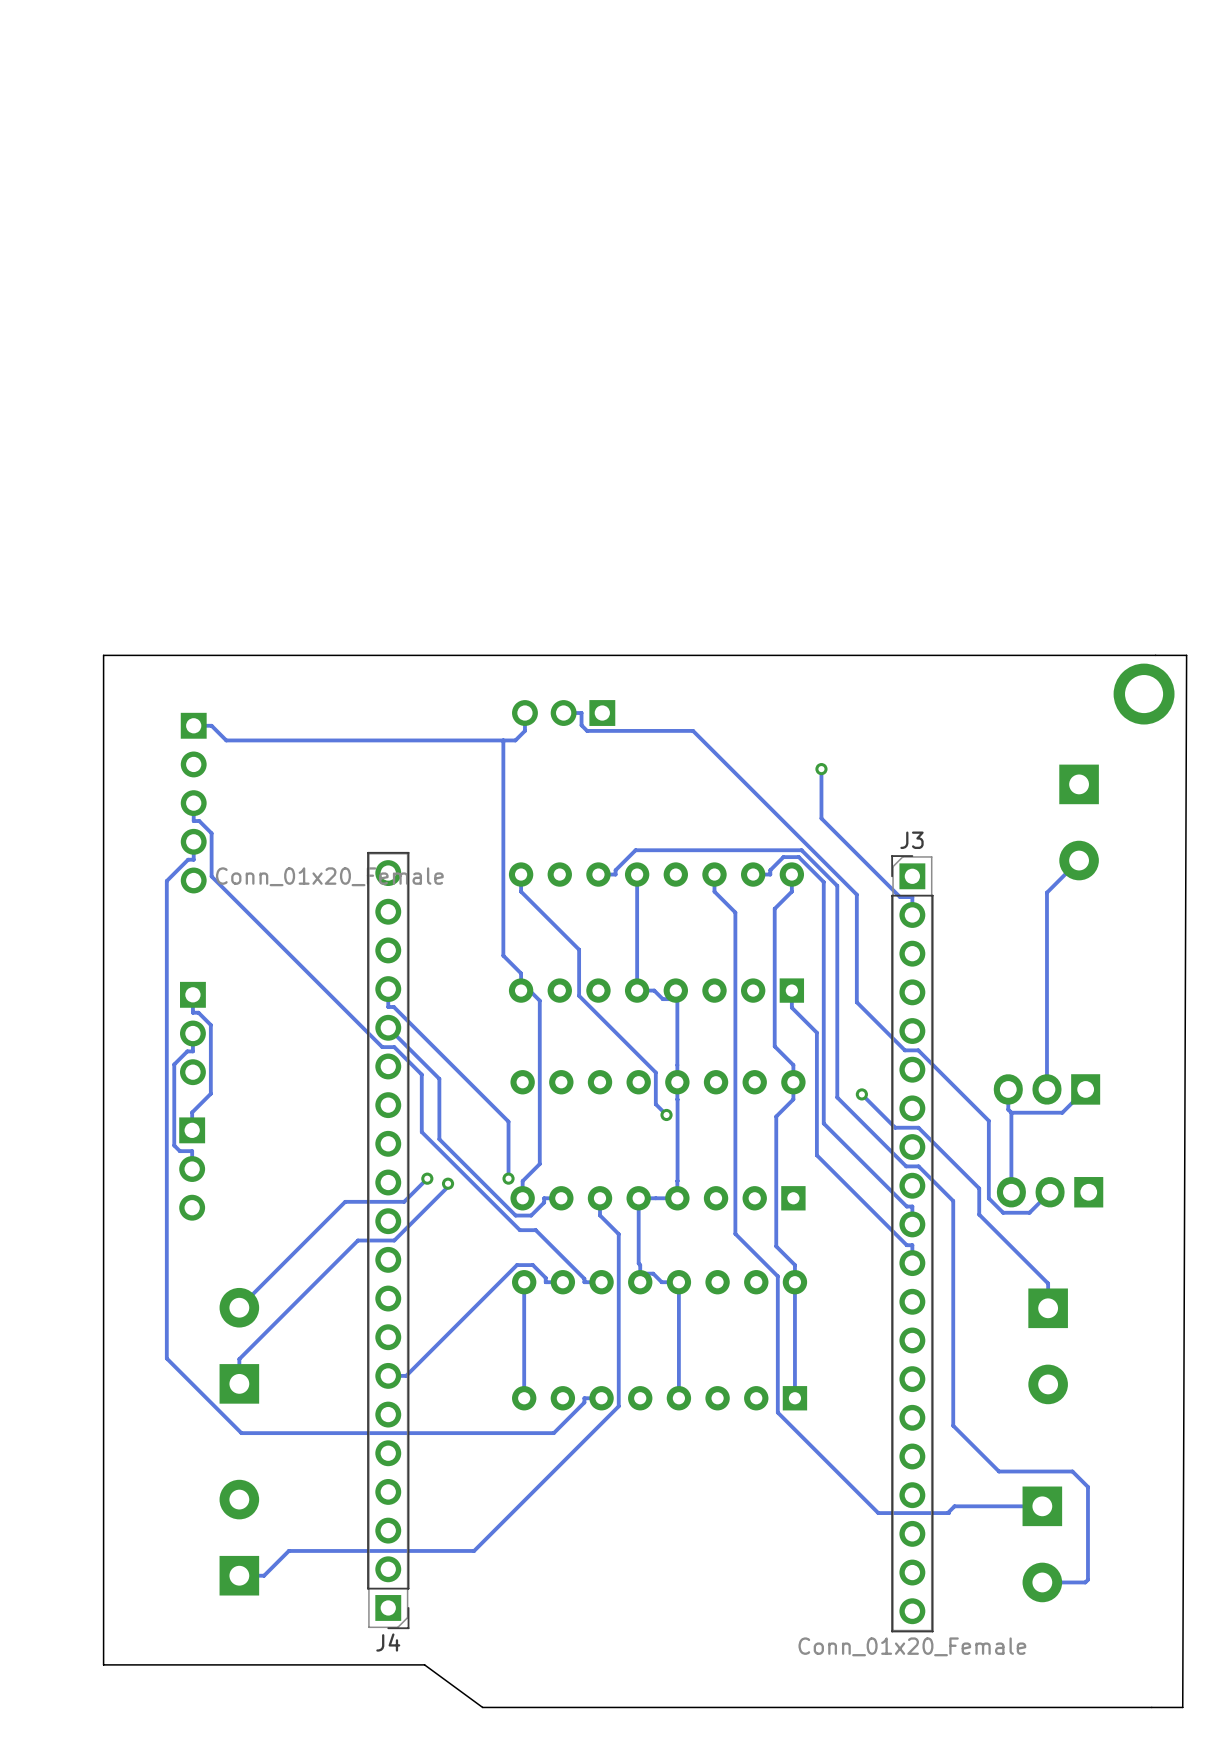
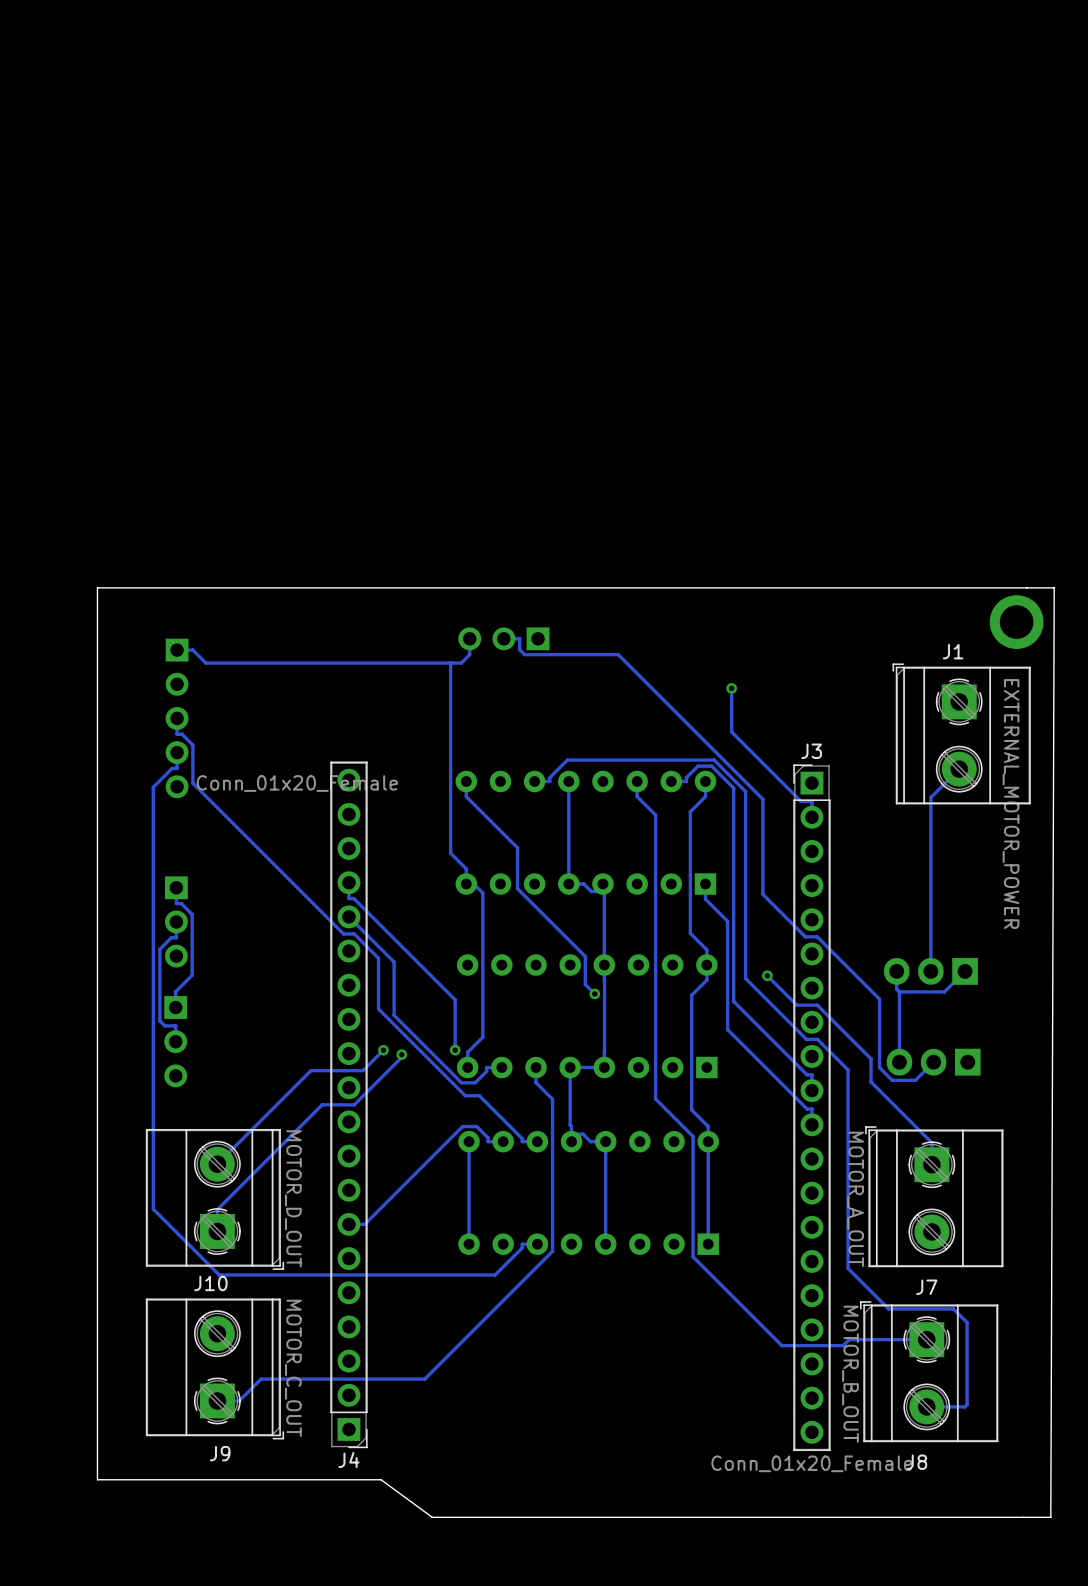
J1 side: top (1079, 822) -> bottom (961, 733)
J10 side: top (239, 1345) -> bottom (214, 1199)
J7 side: top (1048, 1346) -> bottom (934, 1196)
J9 side: top (239, 1537) -> bottom (214, 1368)
J8 side: top (1042, 1544) -> bottom (929, 1371)

